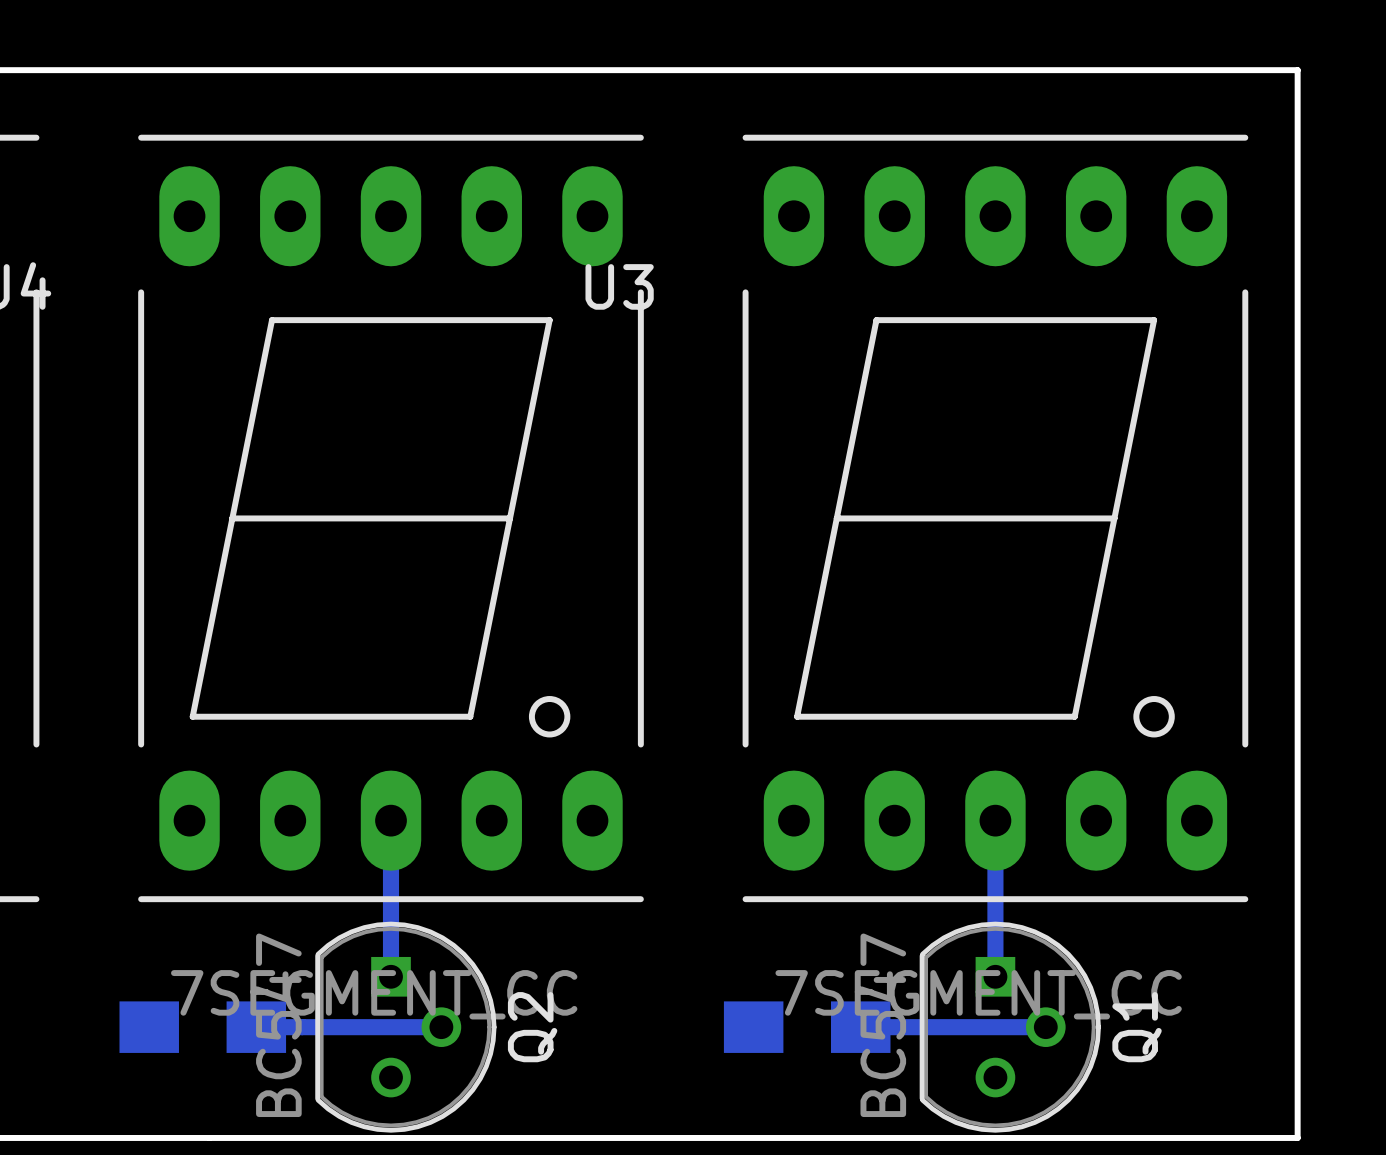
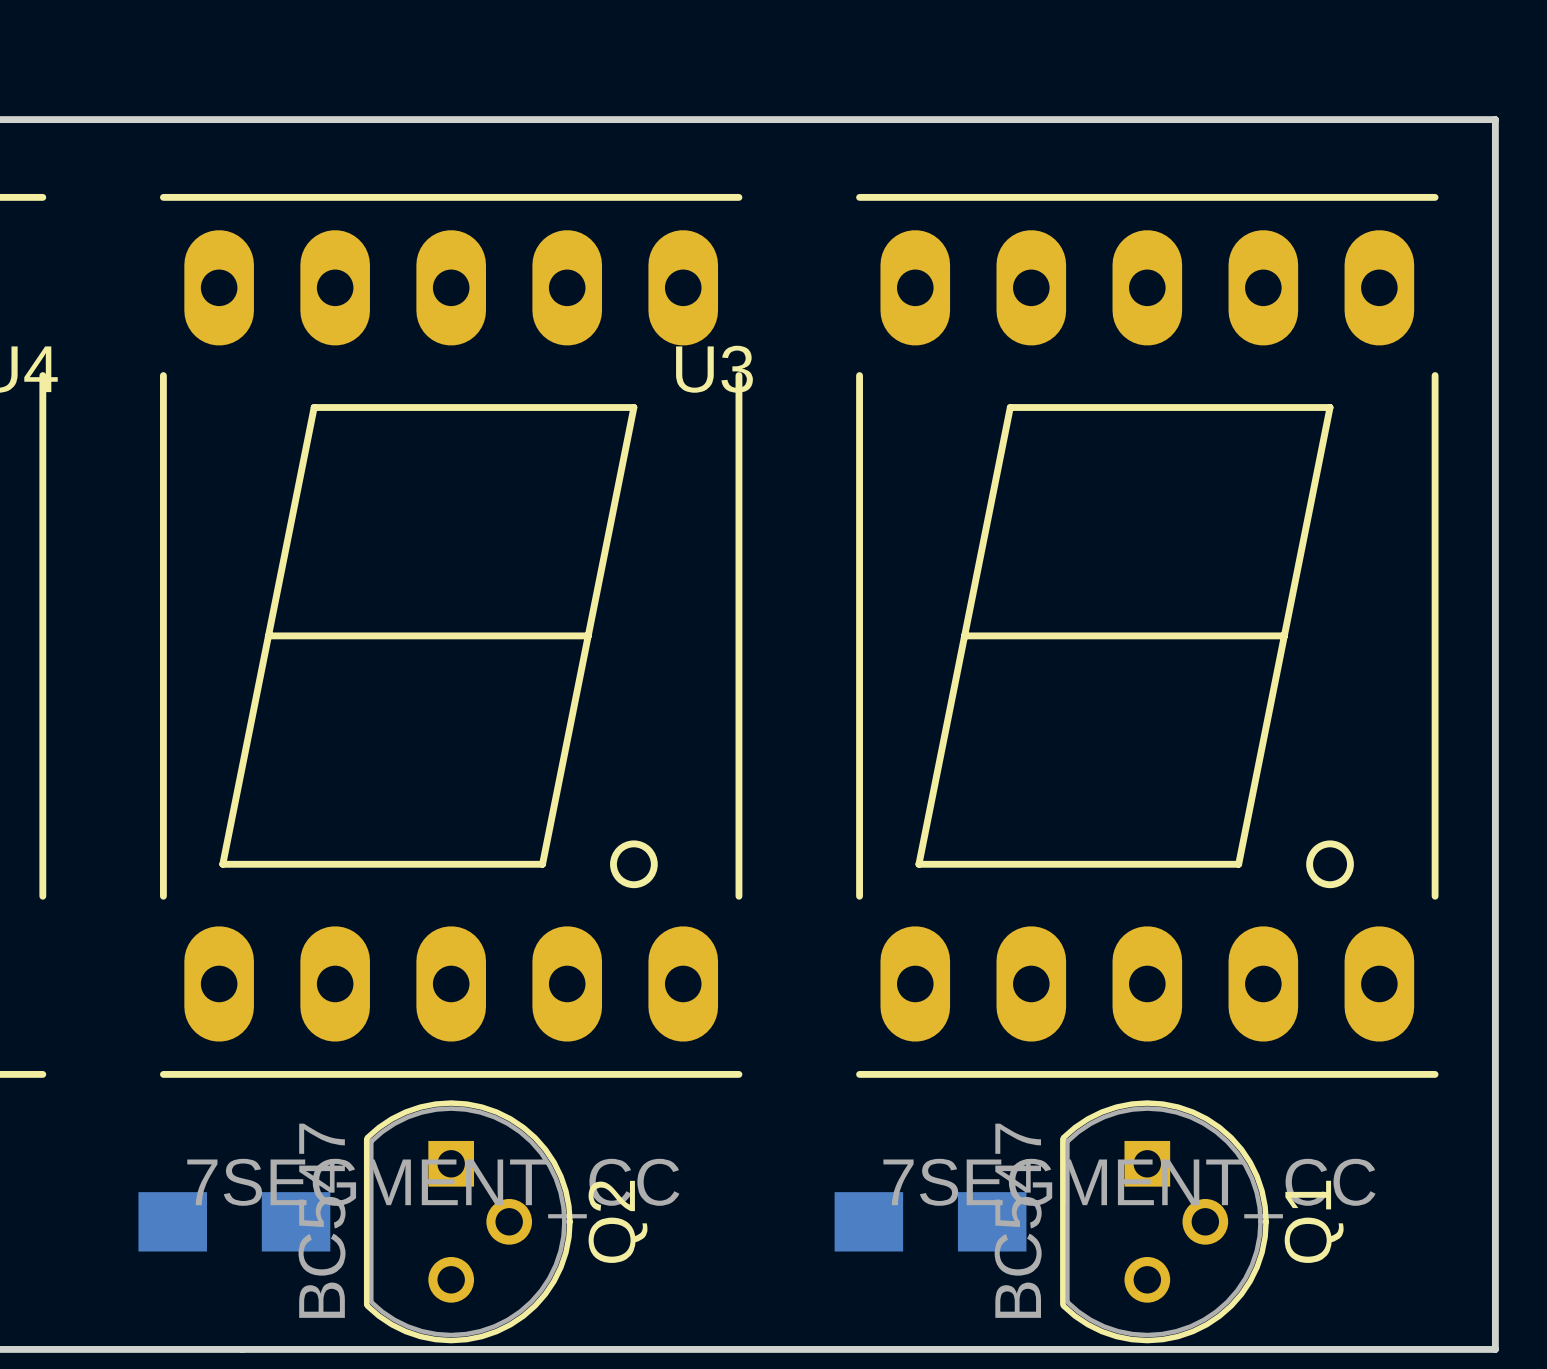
bottom track: (391, 820) (391, 976) -> none
bottom track: (995, 820) (995, 976) -> none
bottom track: (256, 1027) (441, 1027) -> none
bottom track: (860, 1027) (1045, 1027) -> none

